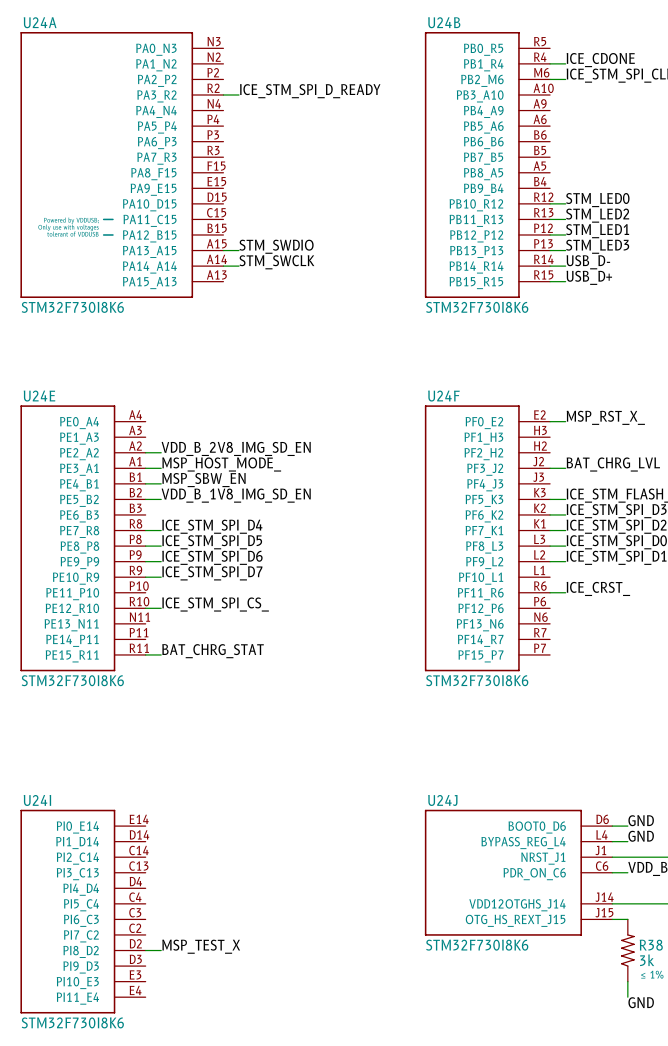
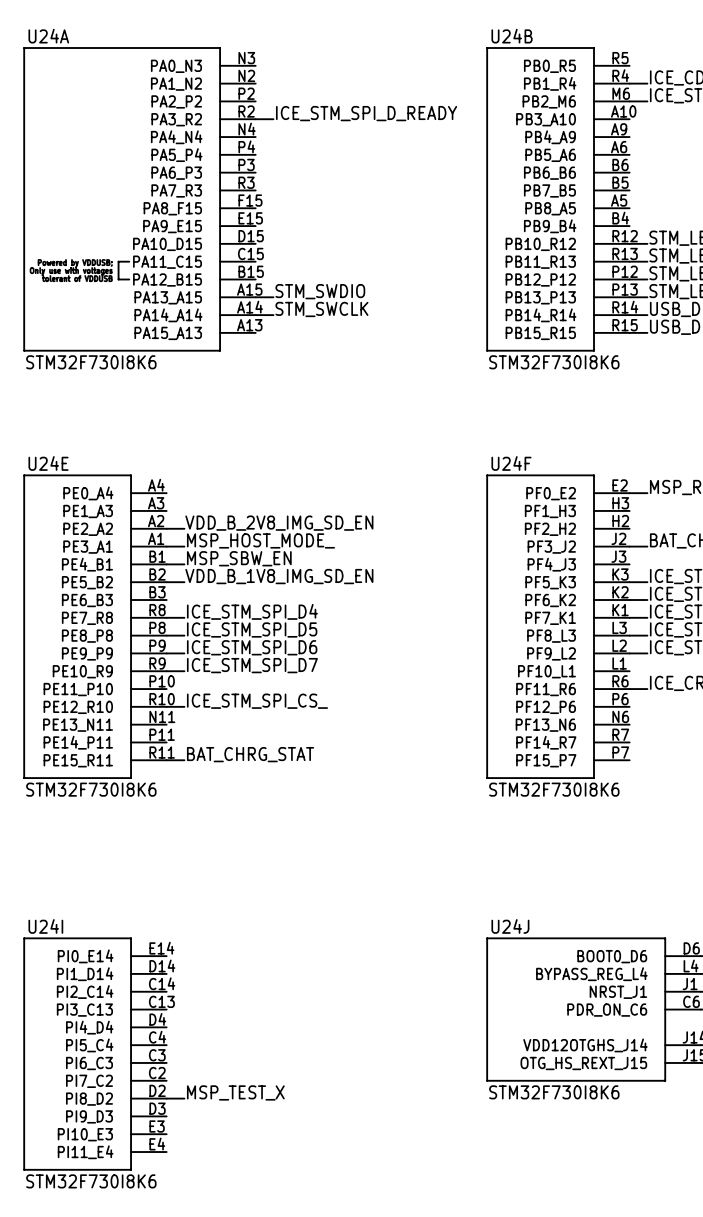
U24A symbol: [20, 32, 224, 298] -> [23, 47, 256, 352]

